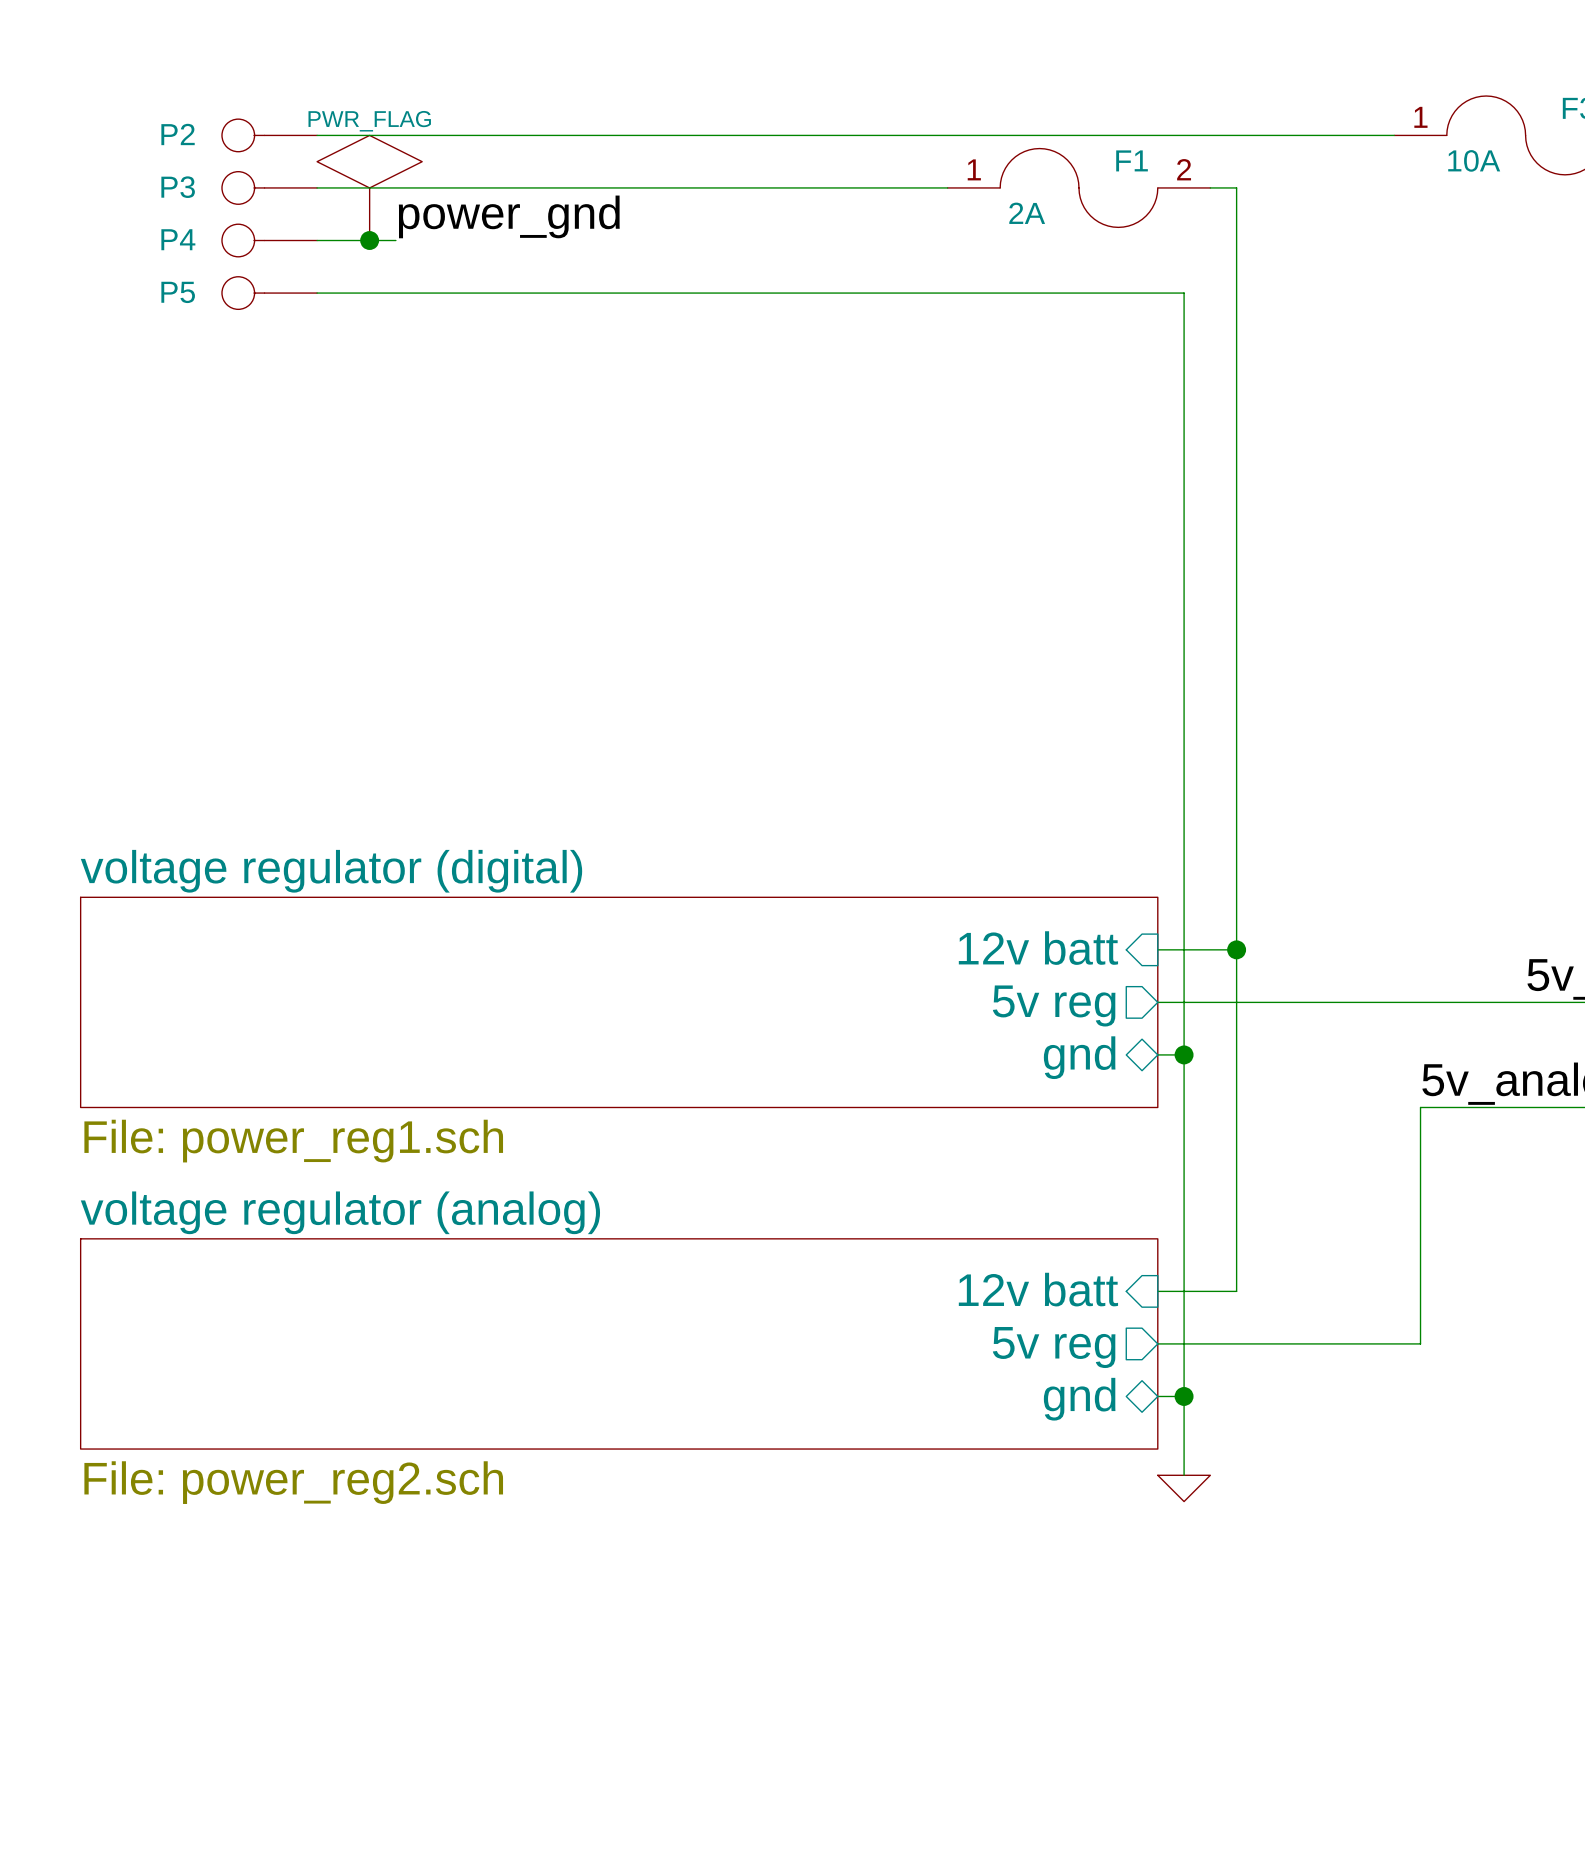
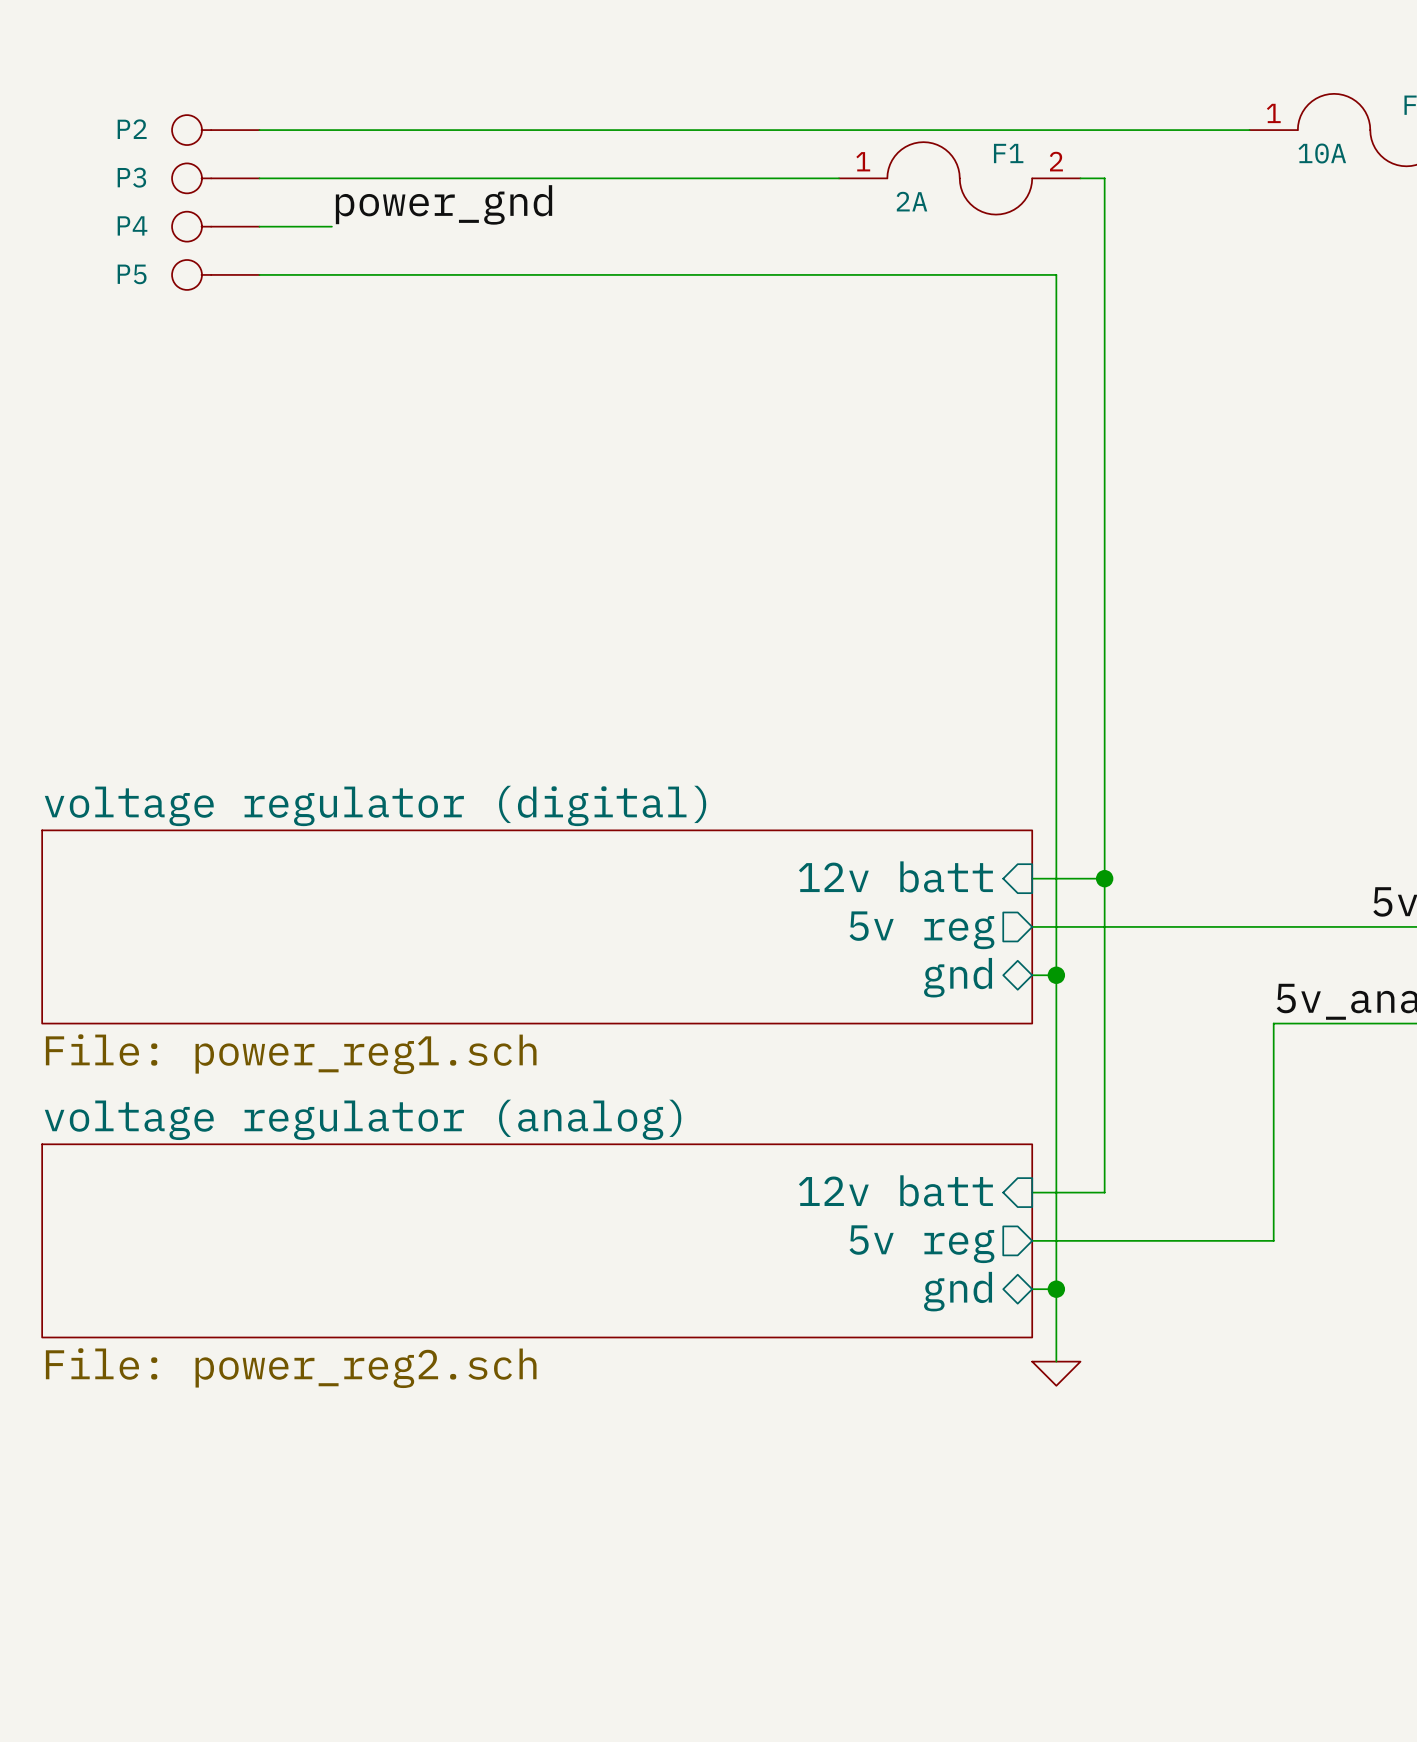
power symbol: PWR_FLAG (369, 187) -> none
junction: (369, 240) -> none

